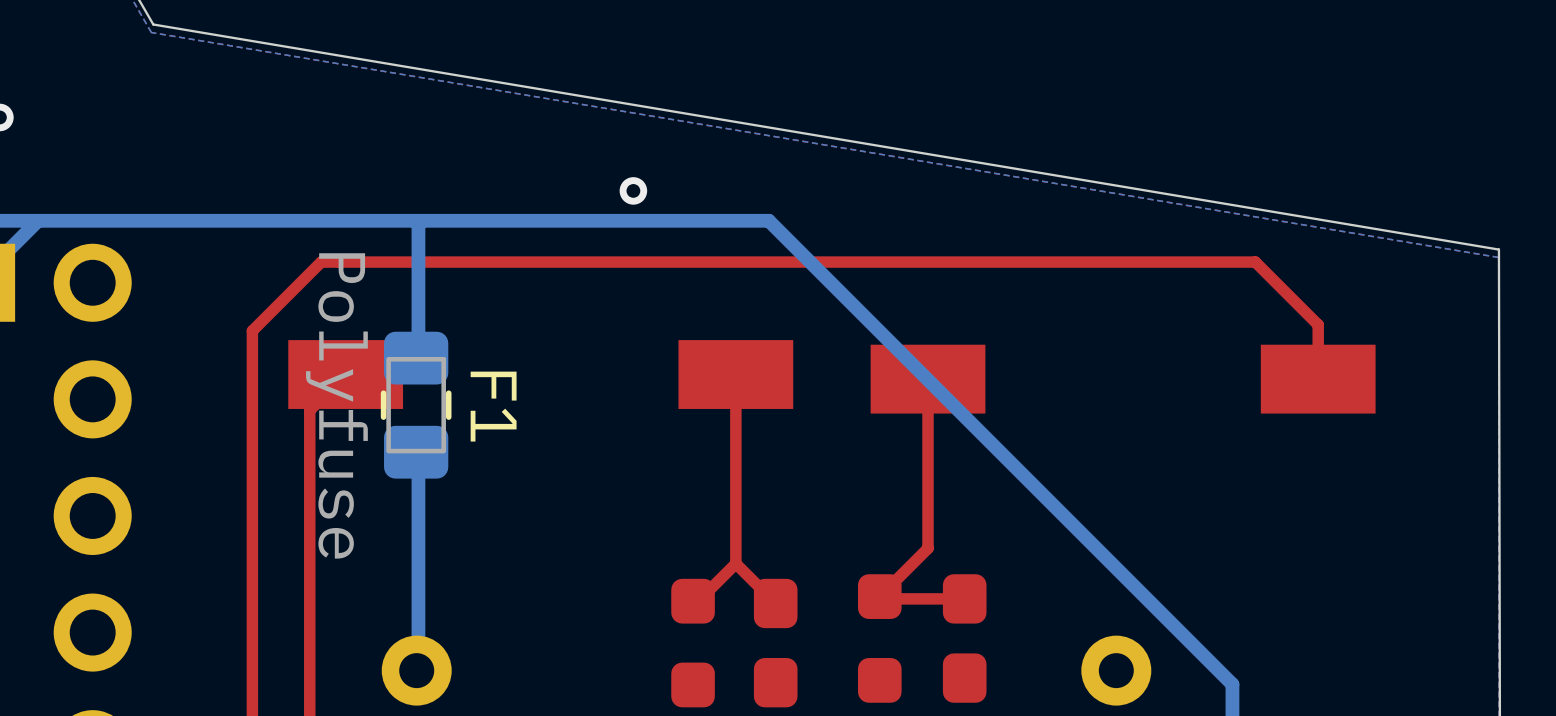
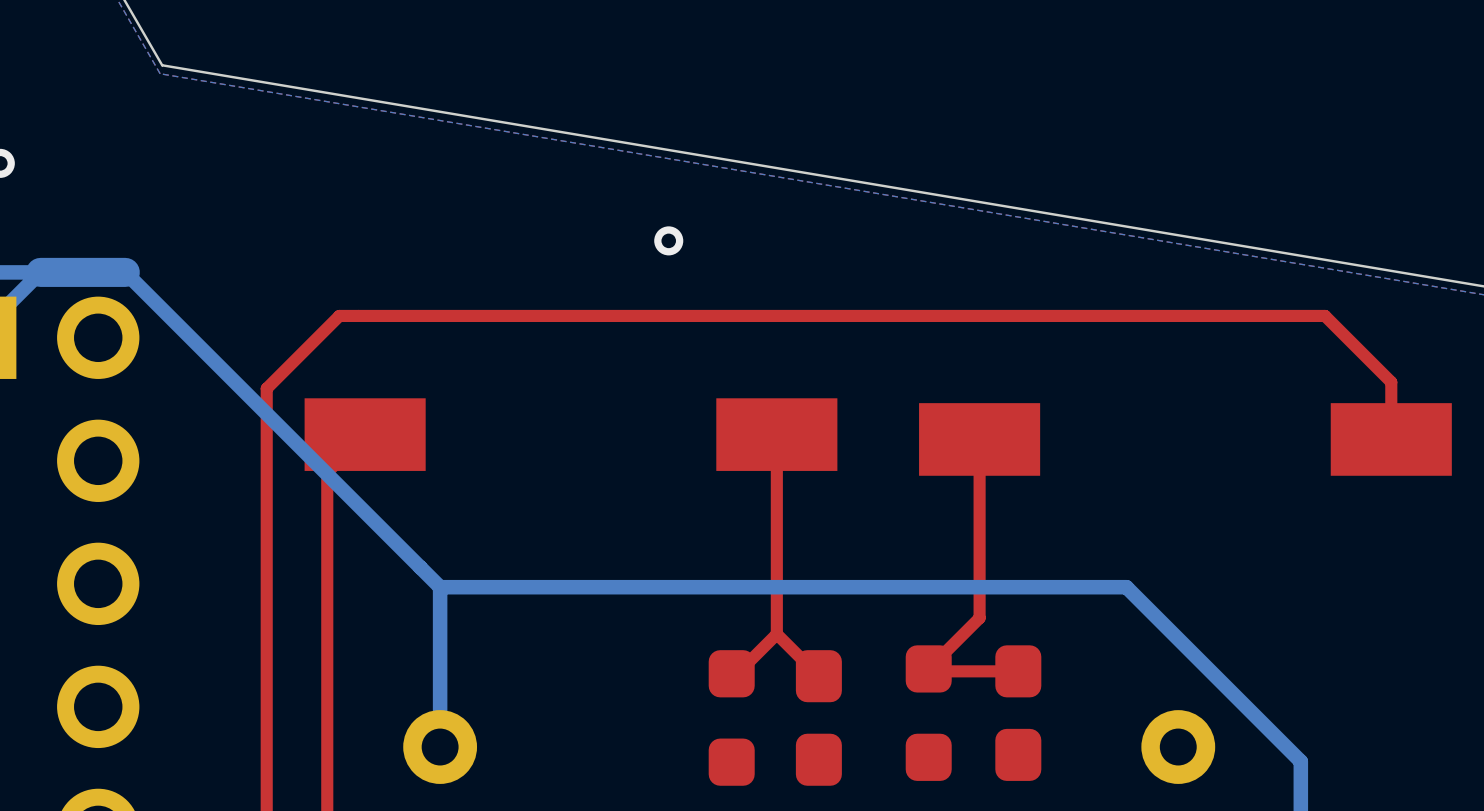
bottom track: none -> (40, 272) (125, 272) (440, 587)
bottom track: (118, 220) (768, 220) (1067, 519) -> (440, 587) (1126, 587)
bottom track: (418, 220) (418, 355) (416, 358) -> none
F1: Polyfuse (416, 405) -> none
bottom track: (416, 452) (418, 454) (418, 668) (416, 670) -> (440, 587) (440, 747)

